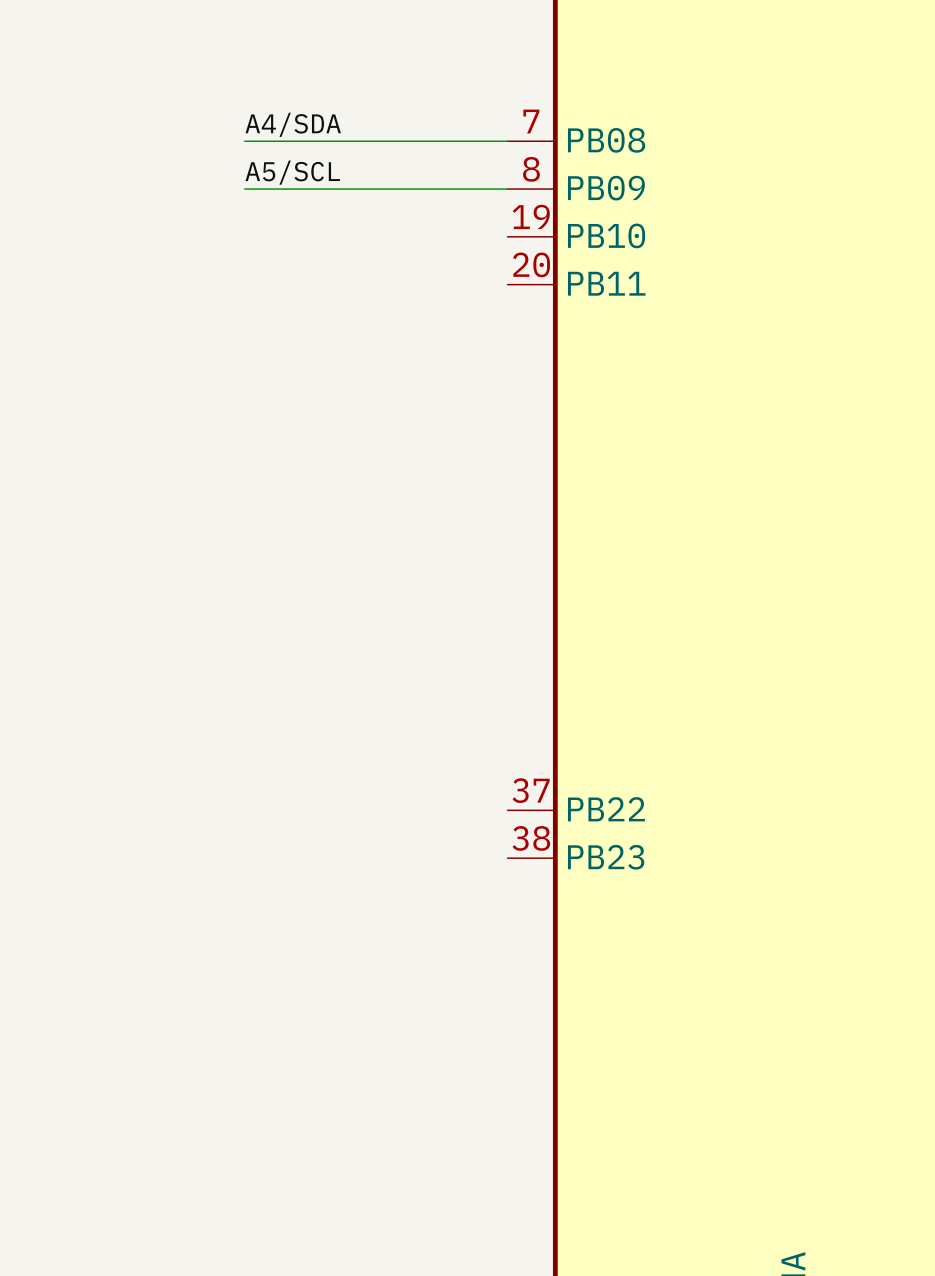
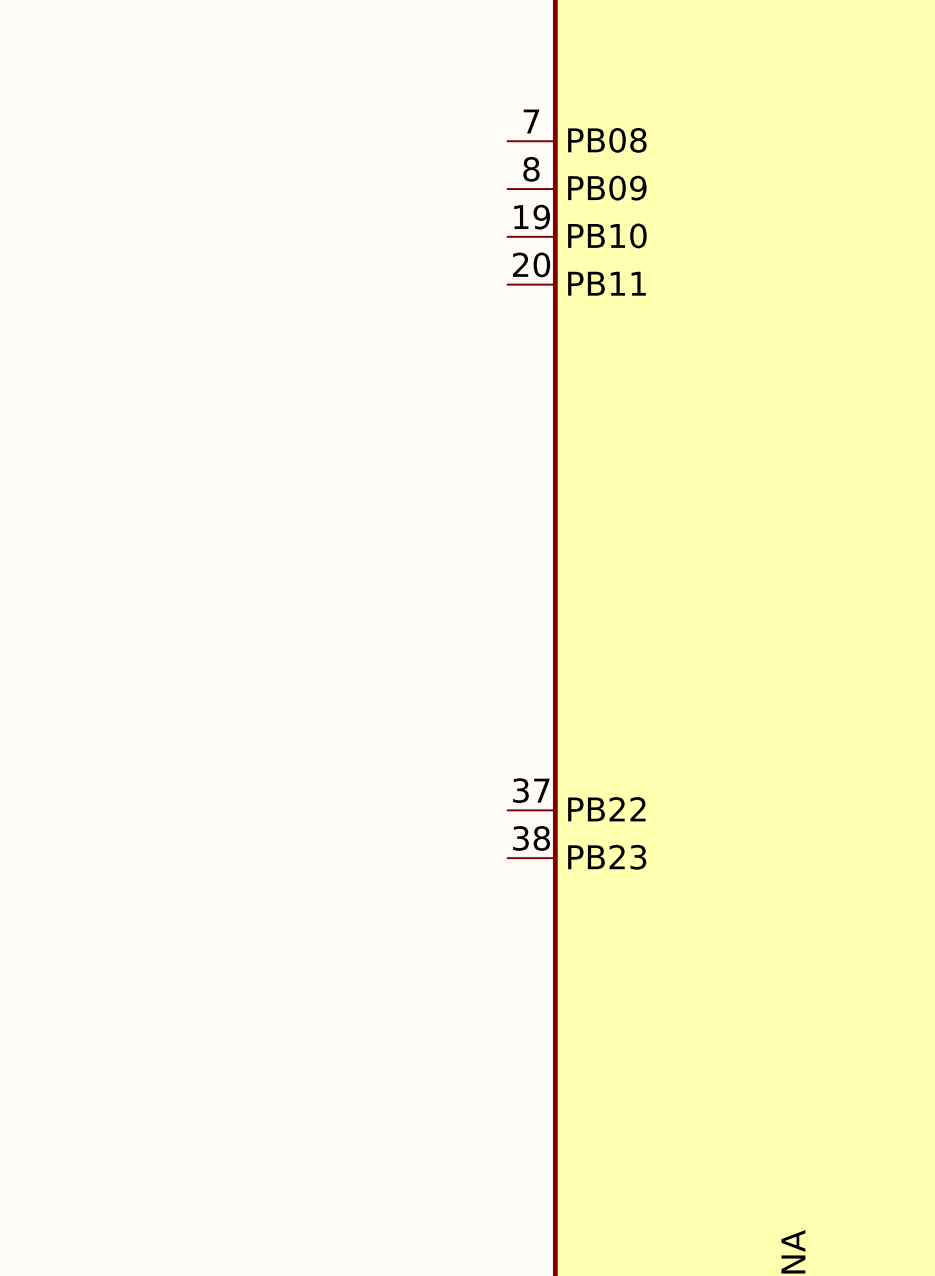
label: A4/SDA (293, 124) -> none
wire: (244, 141) (507, 141) -> none
label: A5/SCL (292, 172) -> none
wire: (244, 189) (507, 189) -> none

